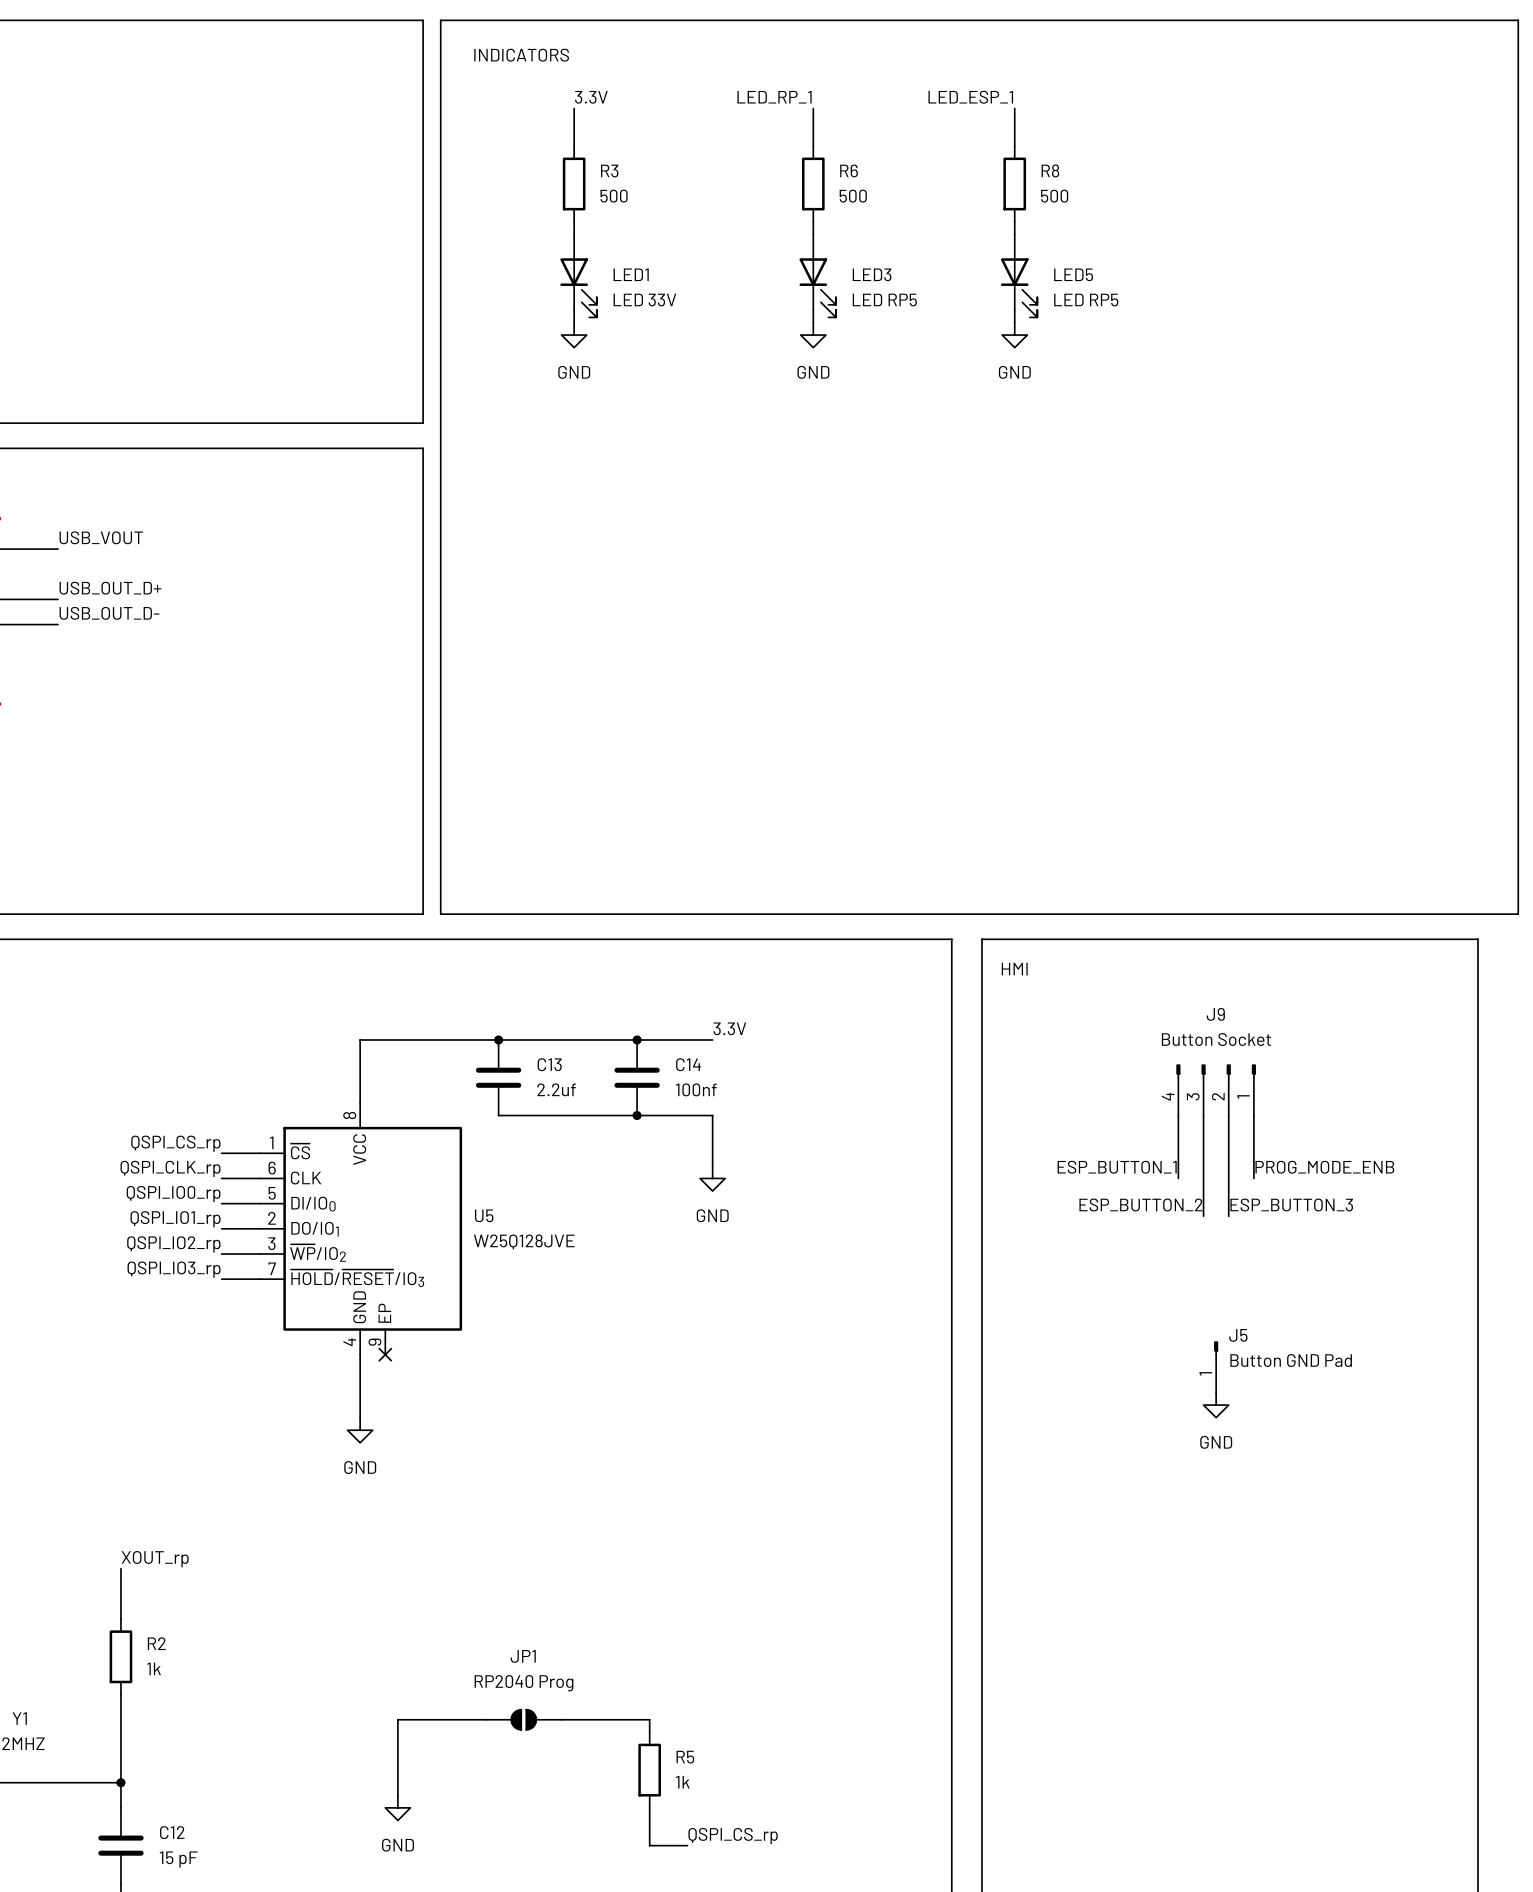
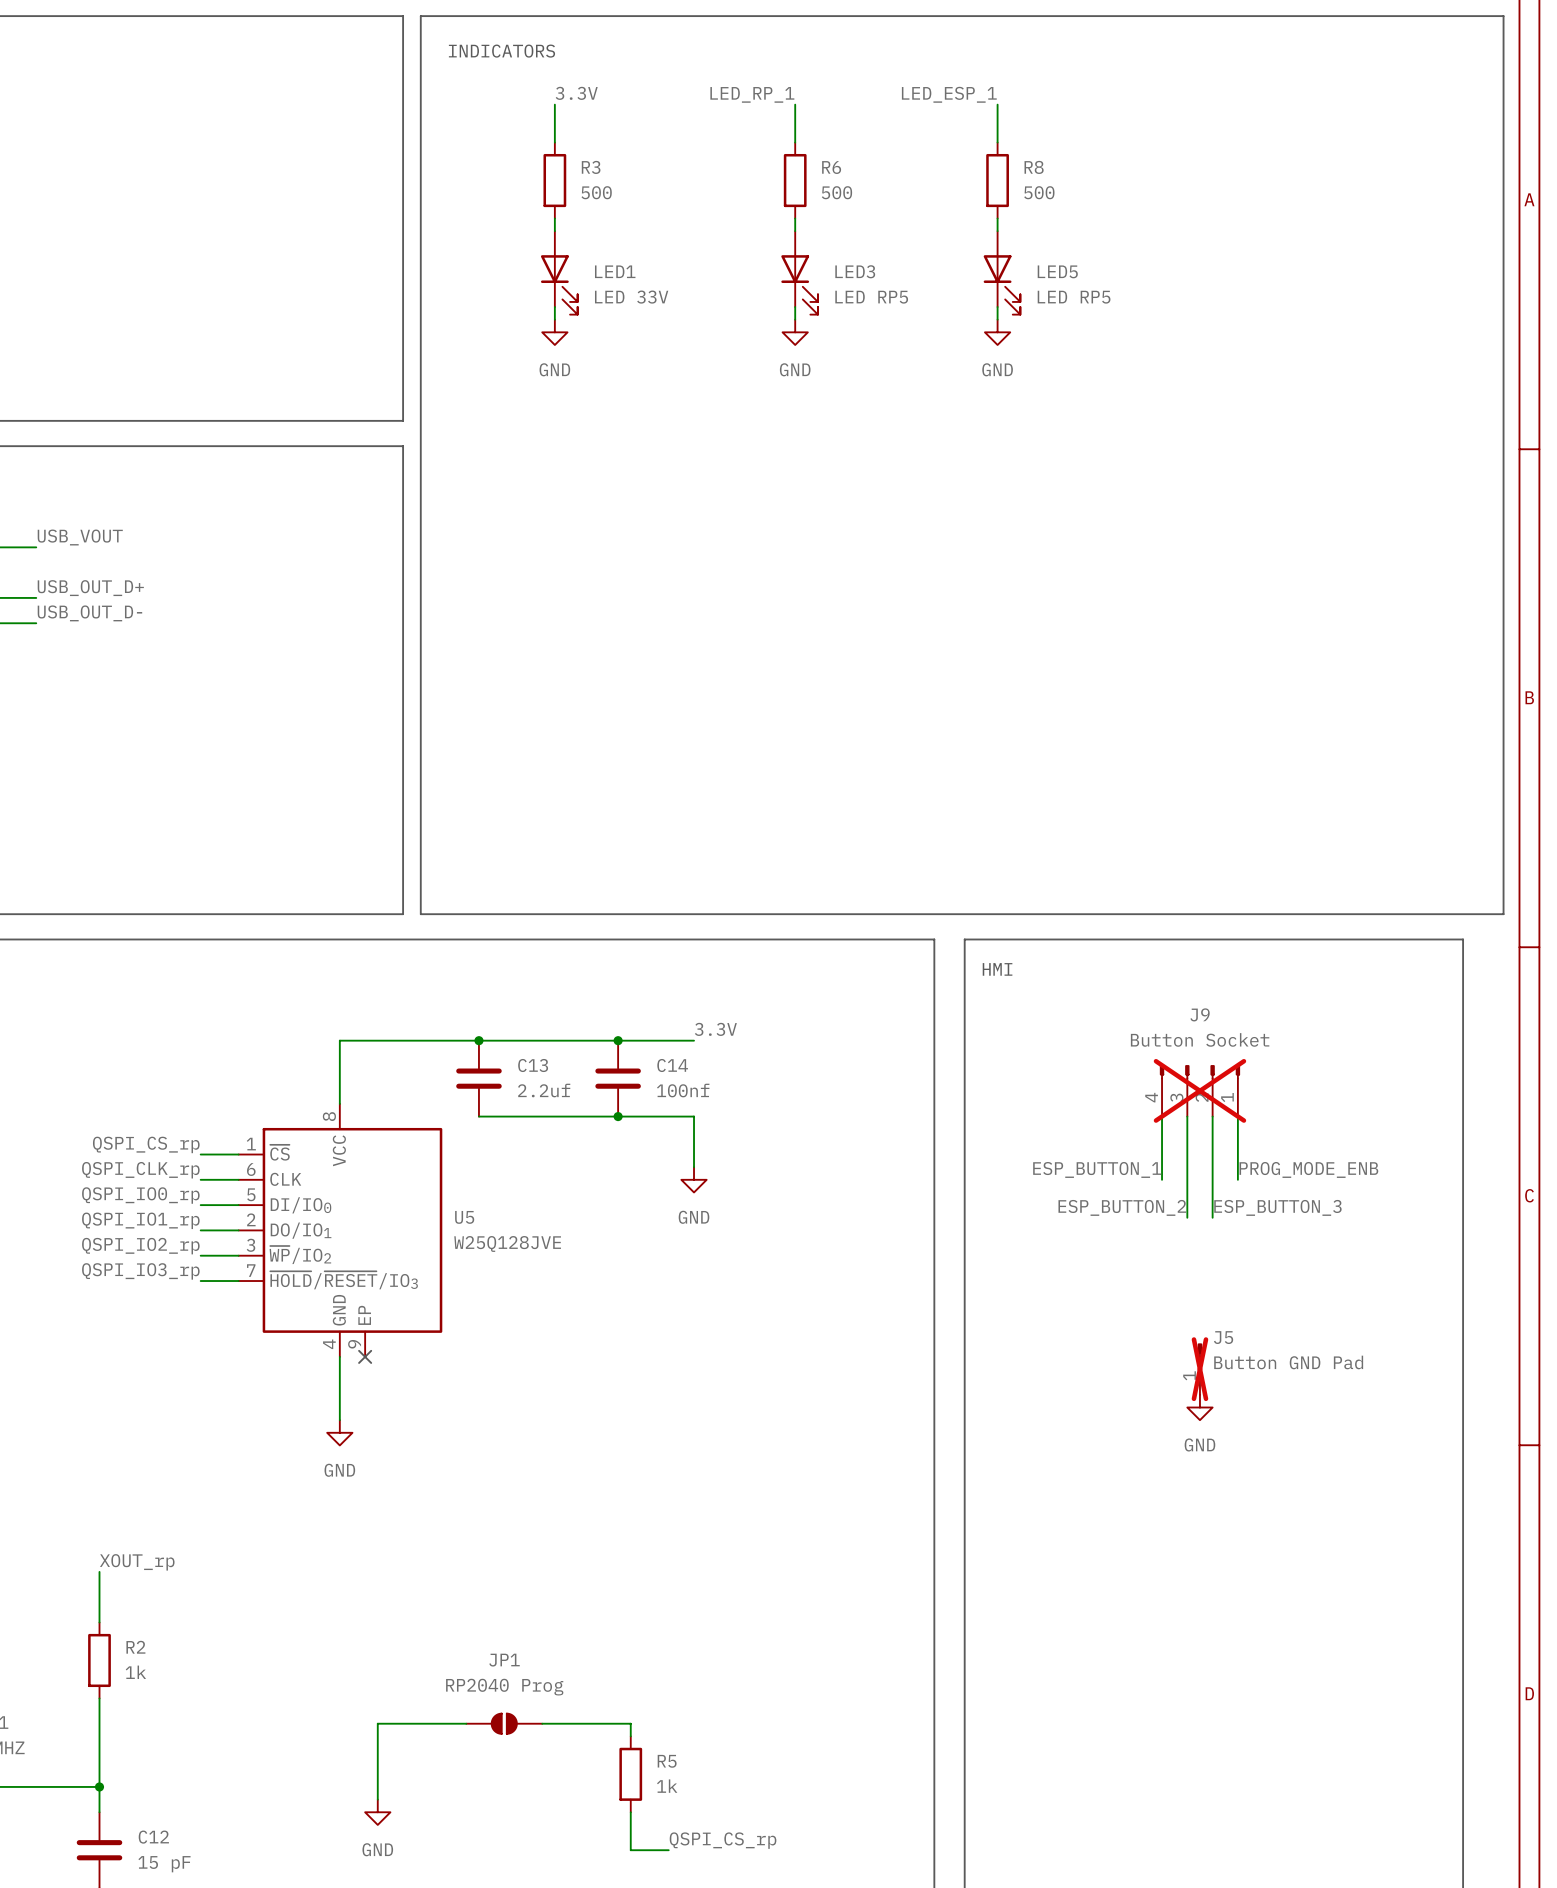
J9 do-not-place cross: none -> (1199, 1090)
J5 do-not-place cross: none -> (1199, 1369)

